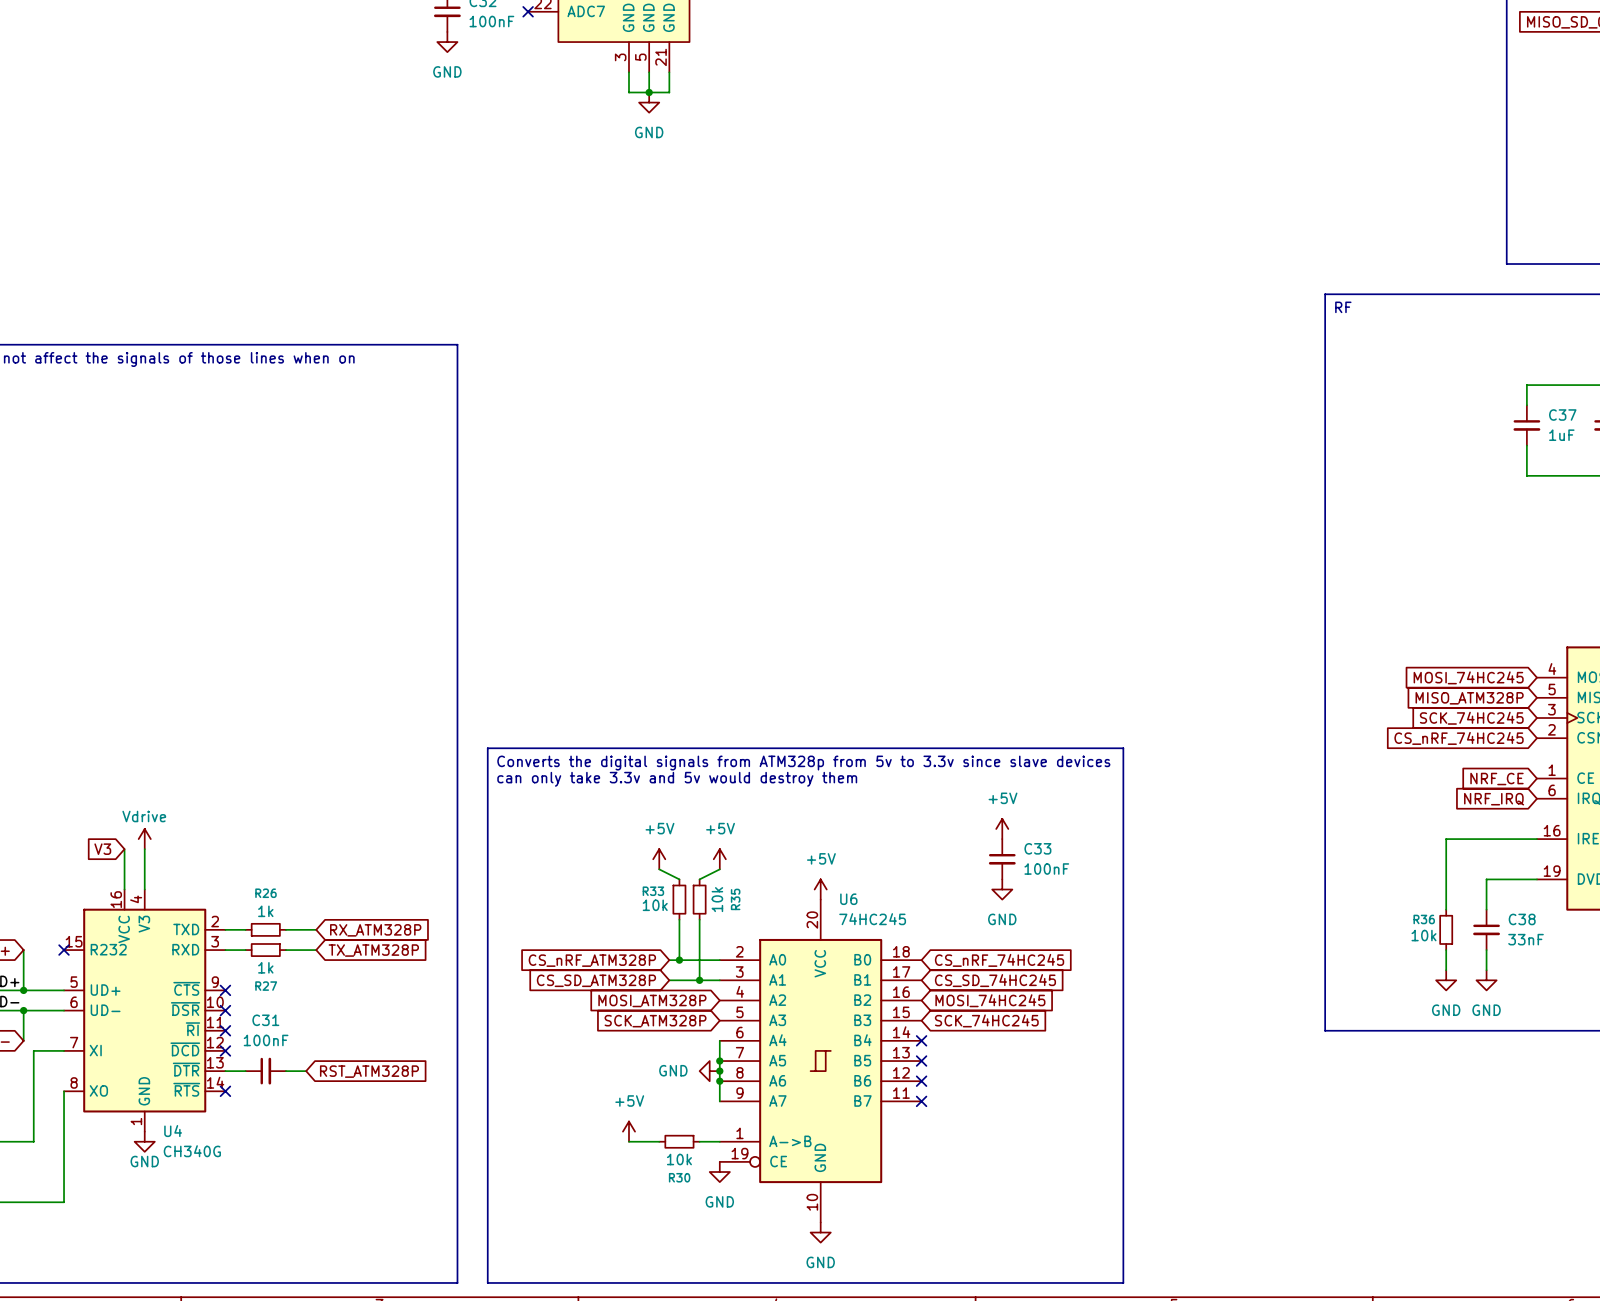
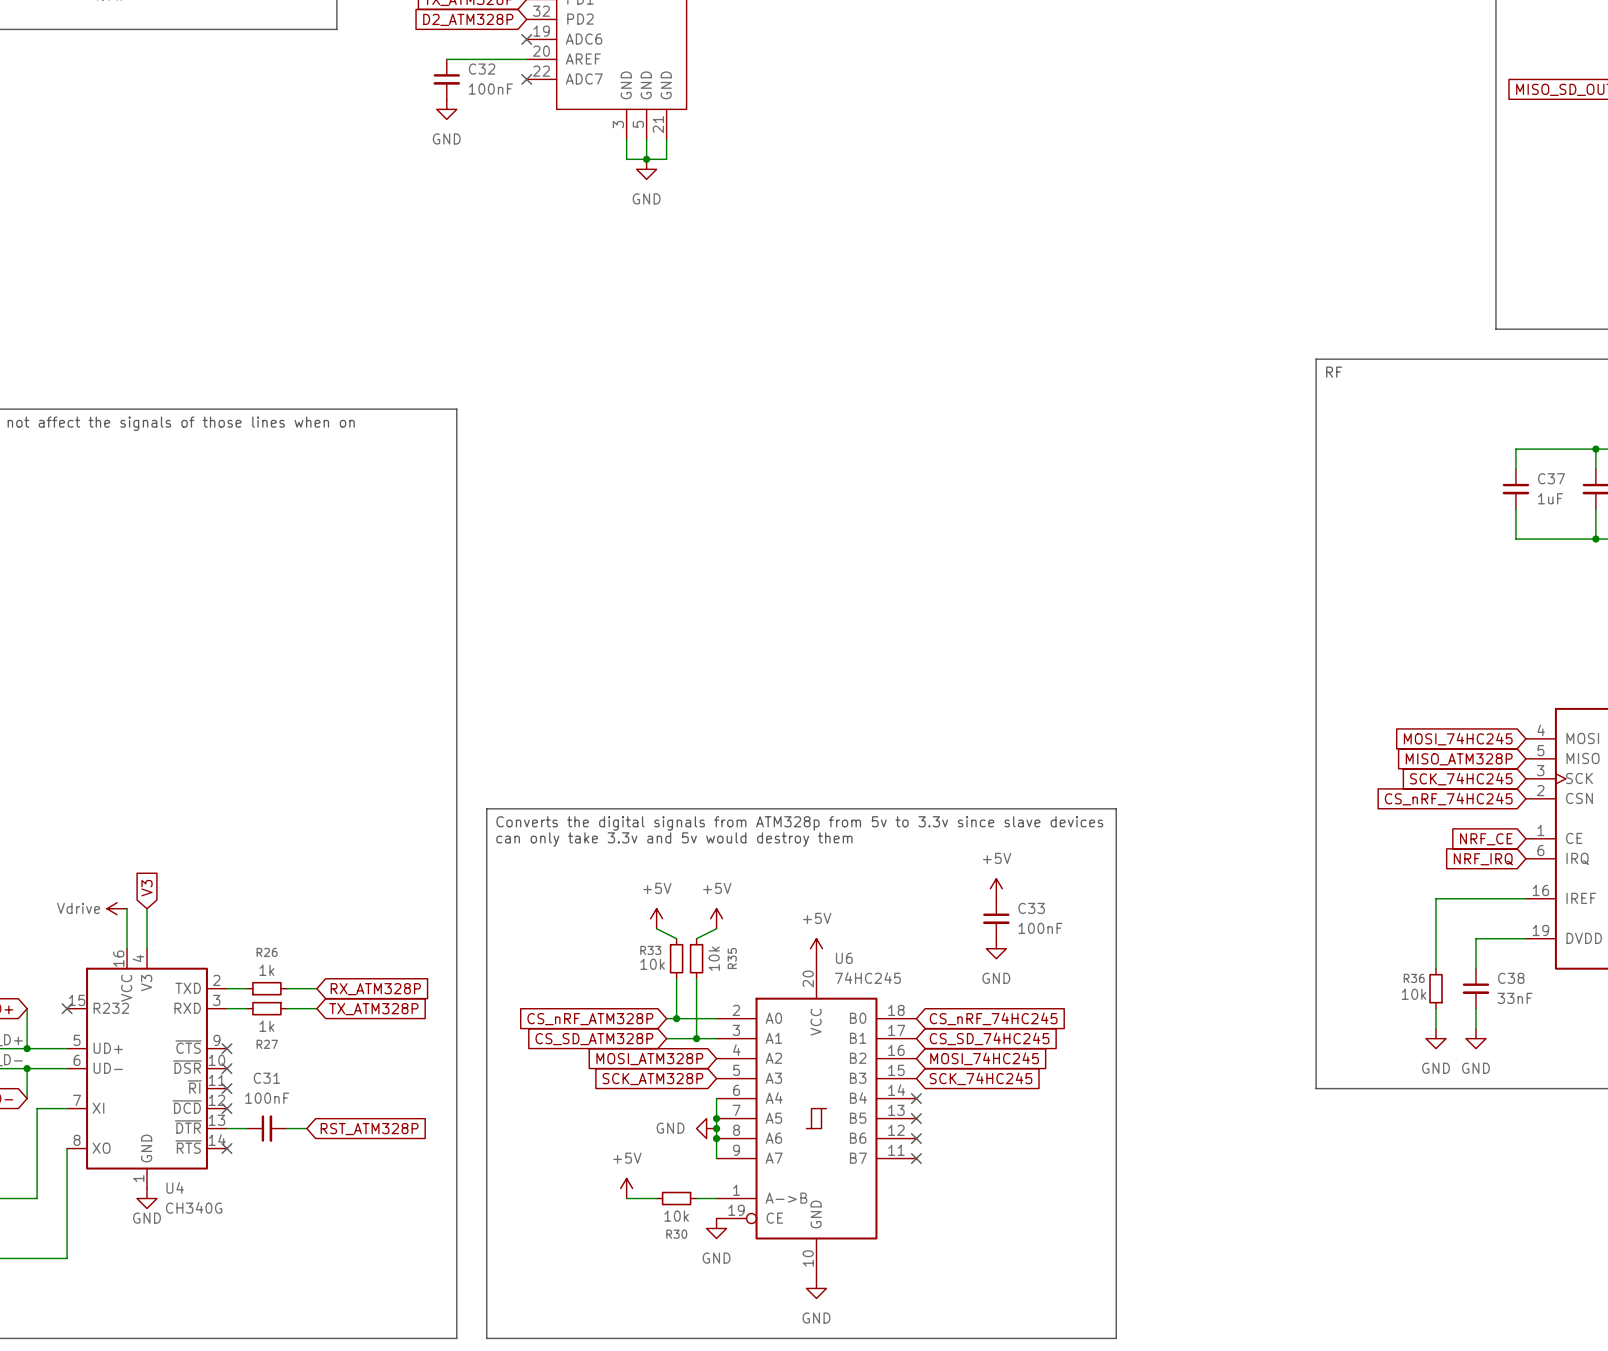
power symbol text position: Vdrive (144, 816) -> Vdrive (78, 908)
power symbol rotation: 0° (144, 839) -> 90° counterclockwise (117, 908)
power symbol position: Vdrive (144, 839) -> Vdrive (117, 908)
global label rotation: 0° (102, 849) -> 90° clockwise (147, 888)
global label position: V3 (102, 849) -> V3 (147, 888)

